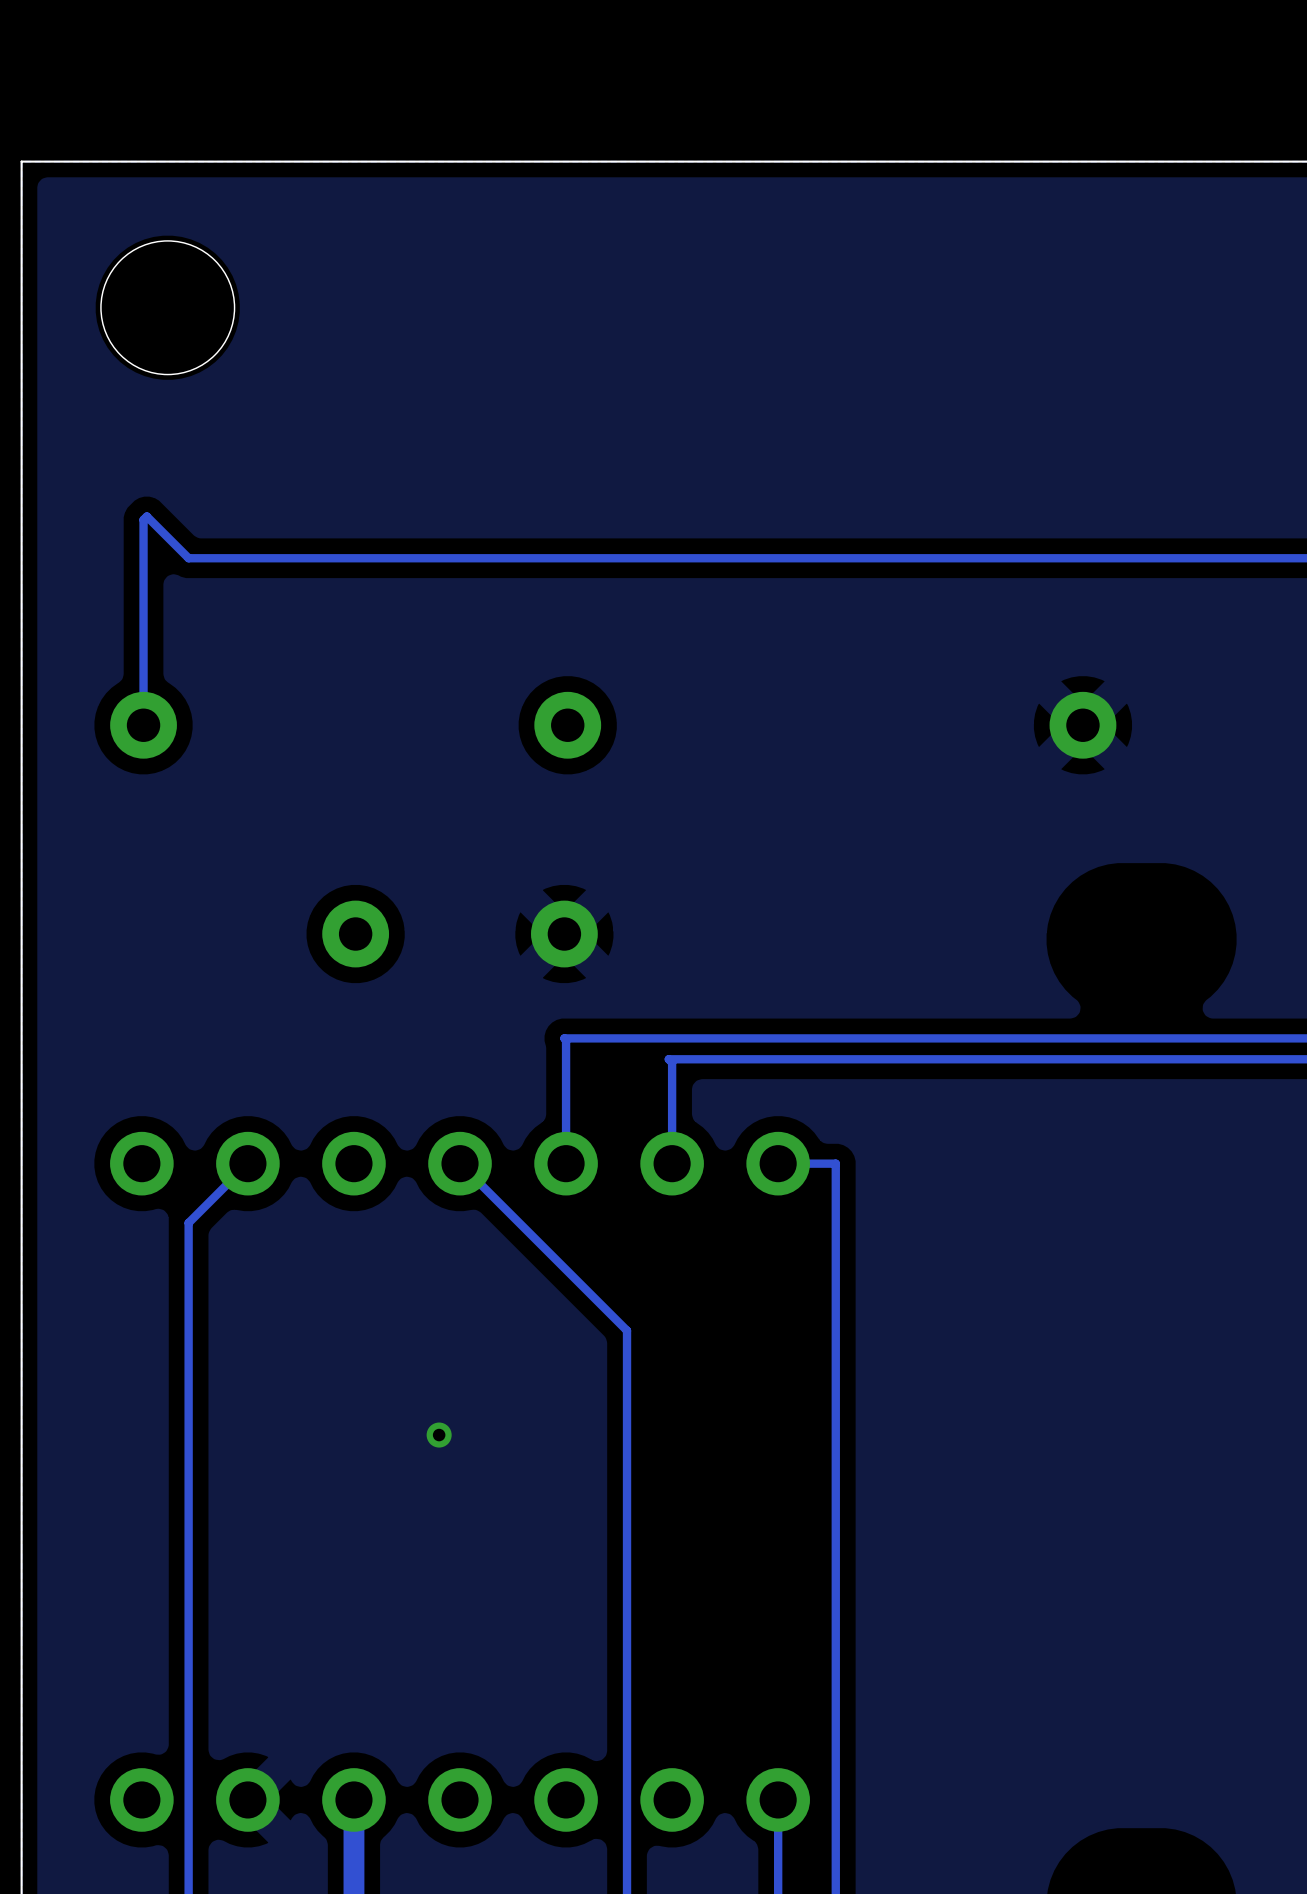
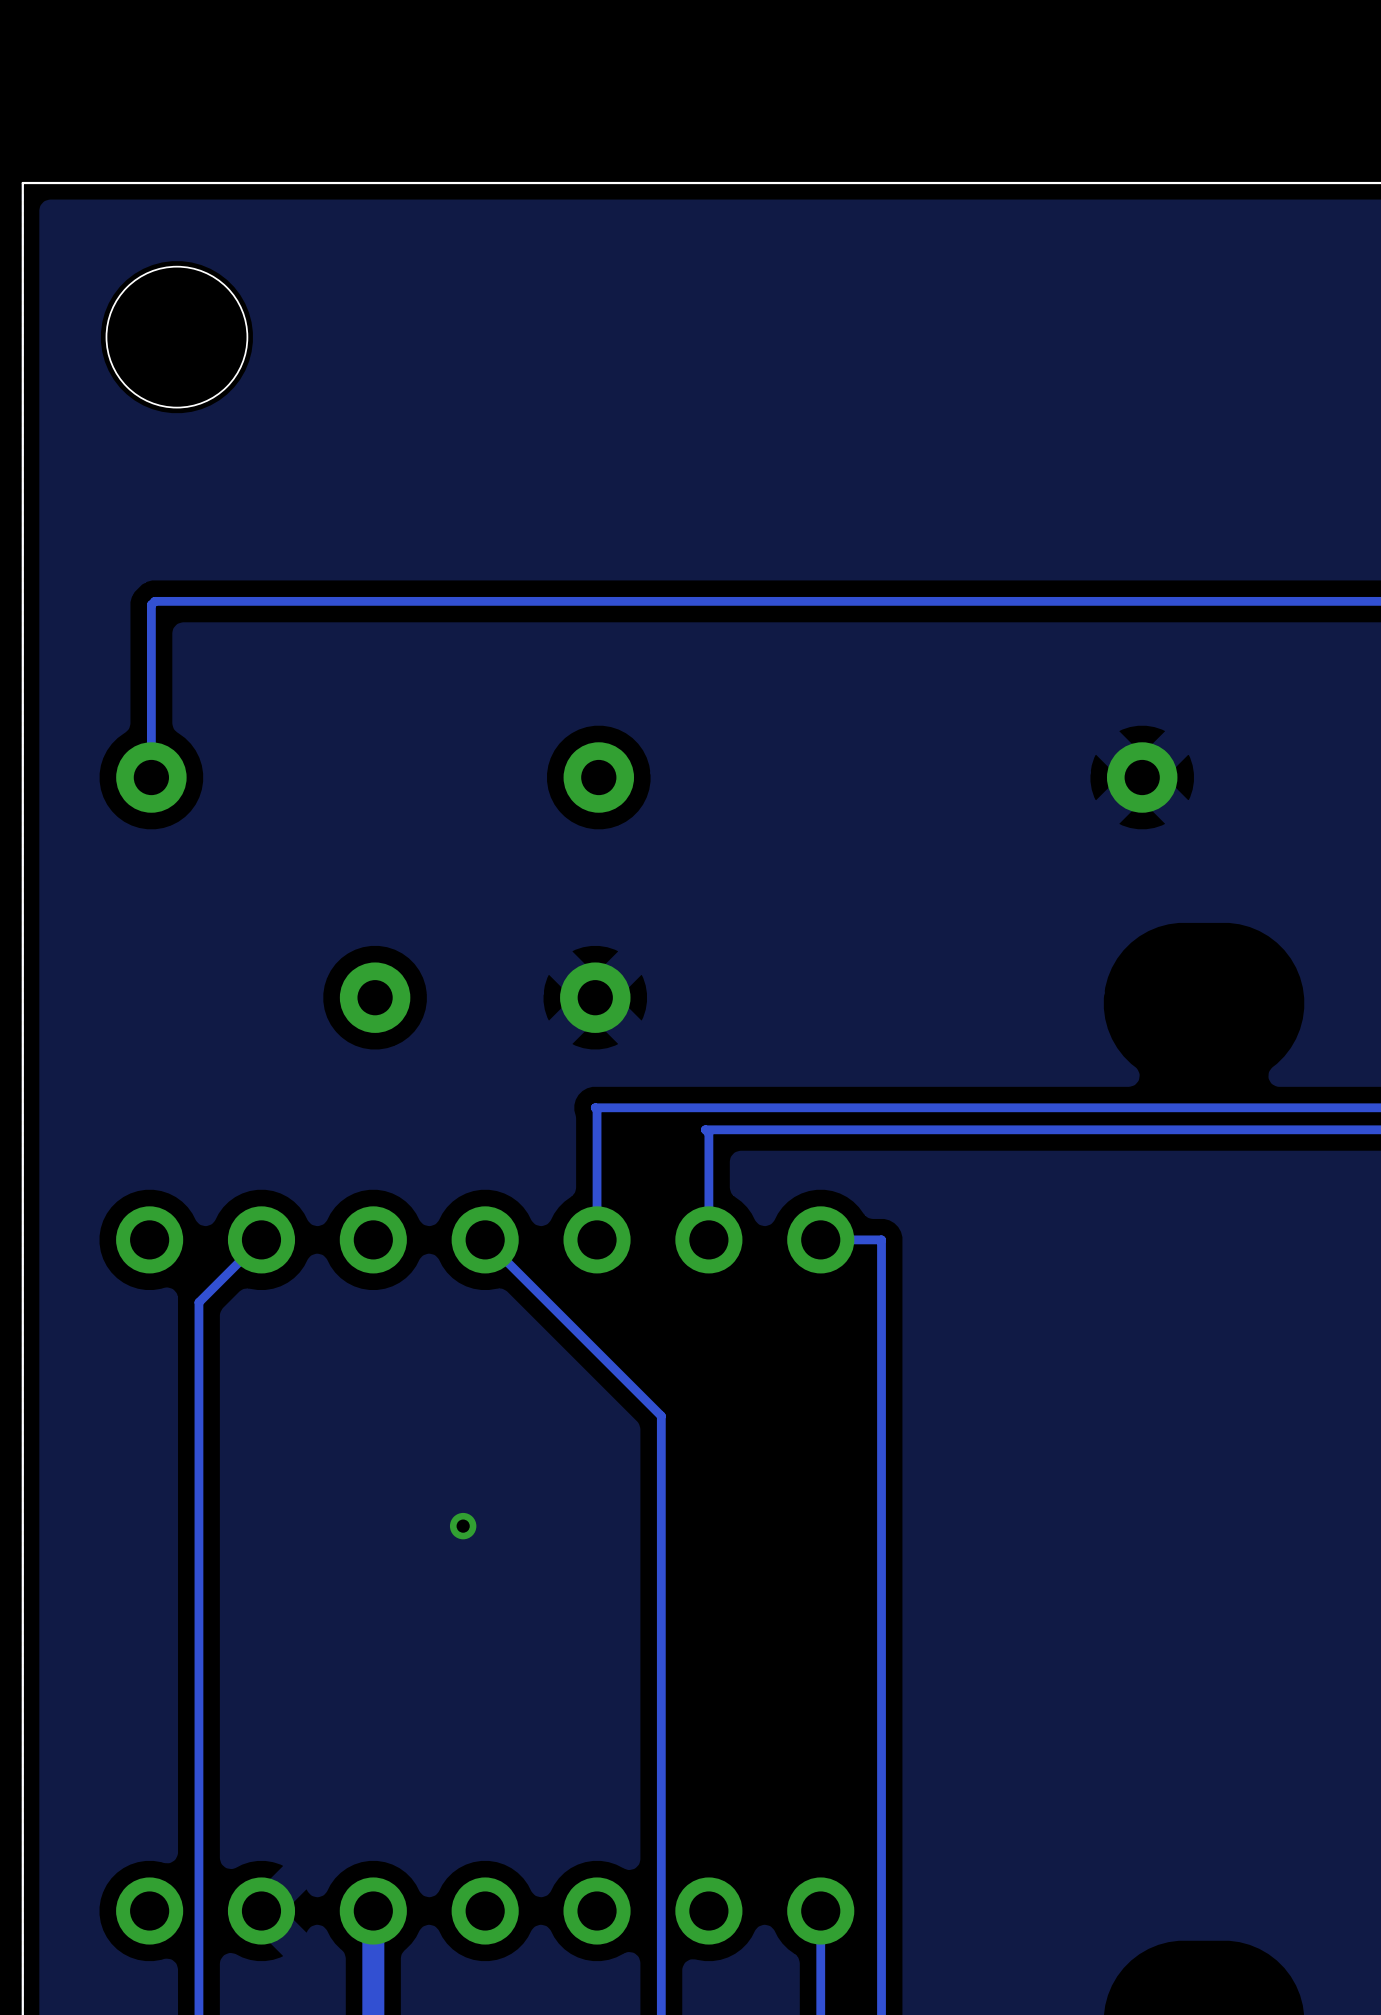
track: (188, 558) (146, 516) (143, 519) (143, 561) -> (198, 601) (154, 601) (151, 604)

